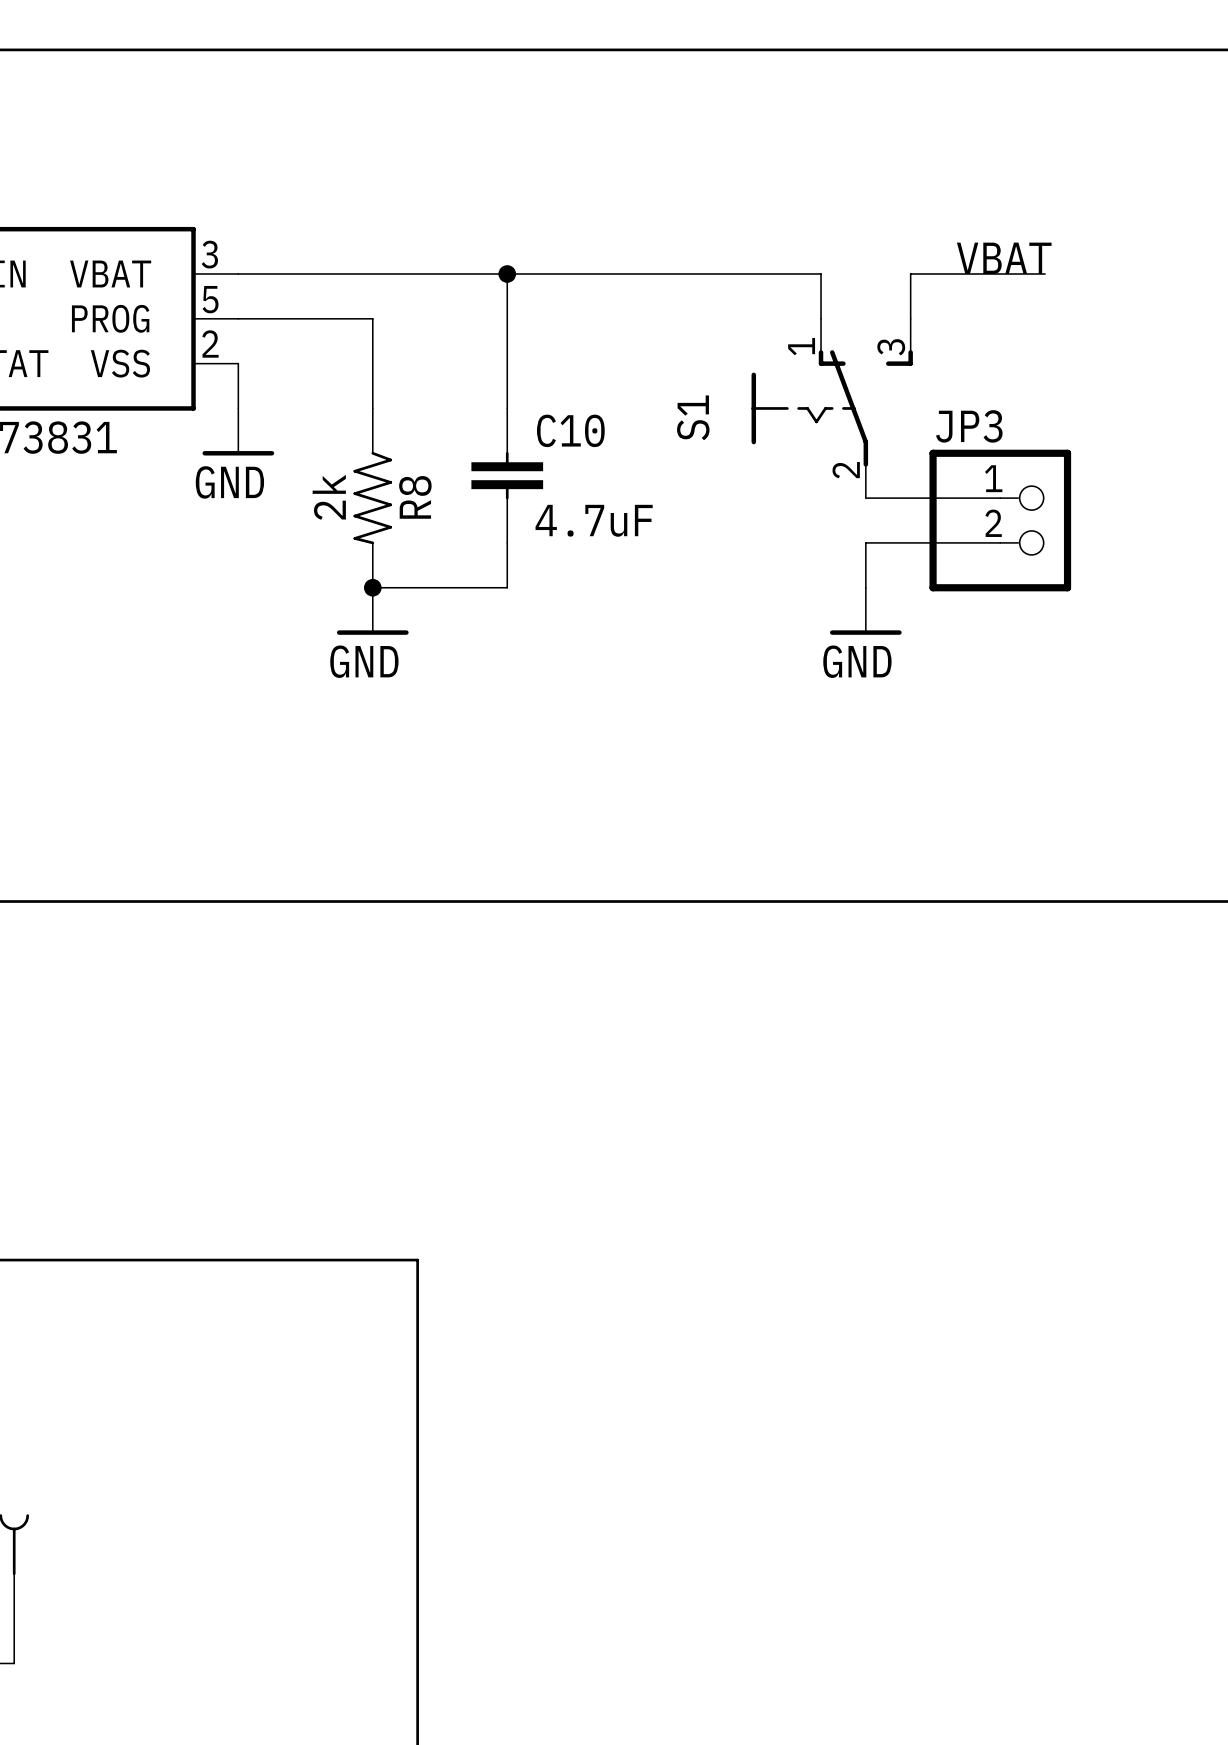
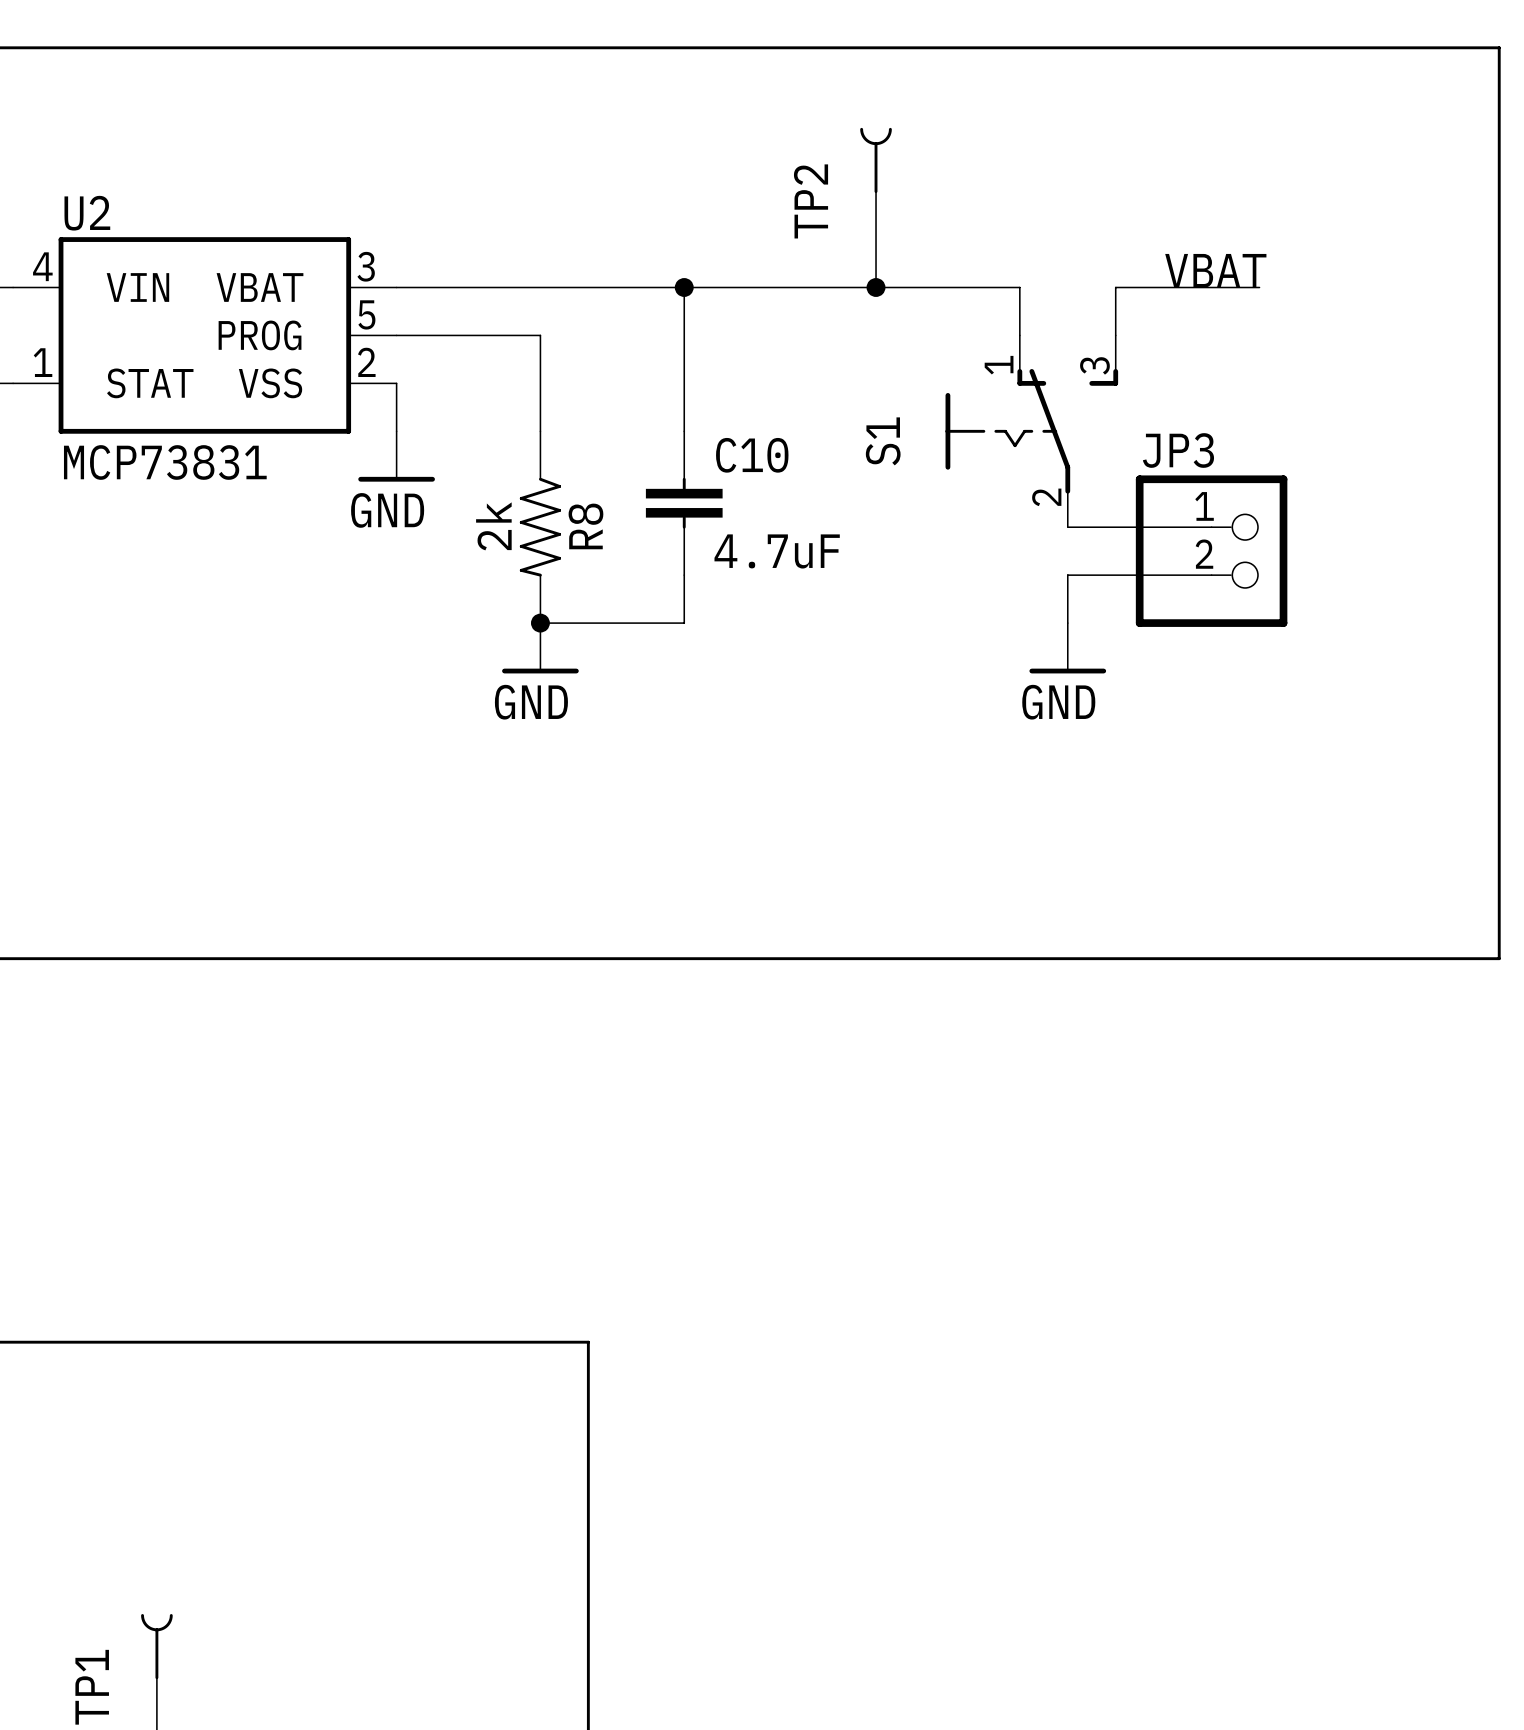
TP2: none -> (876, 160)
wire: none -> (876, 191) (876, 287)
junction: none -> (876, 287)

